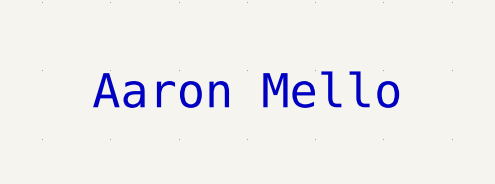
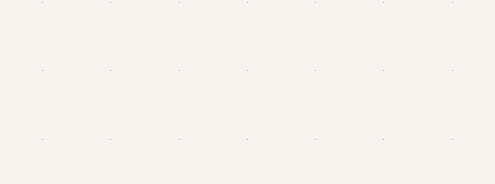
text: Aaron Mello (246, 89) -> none

